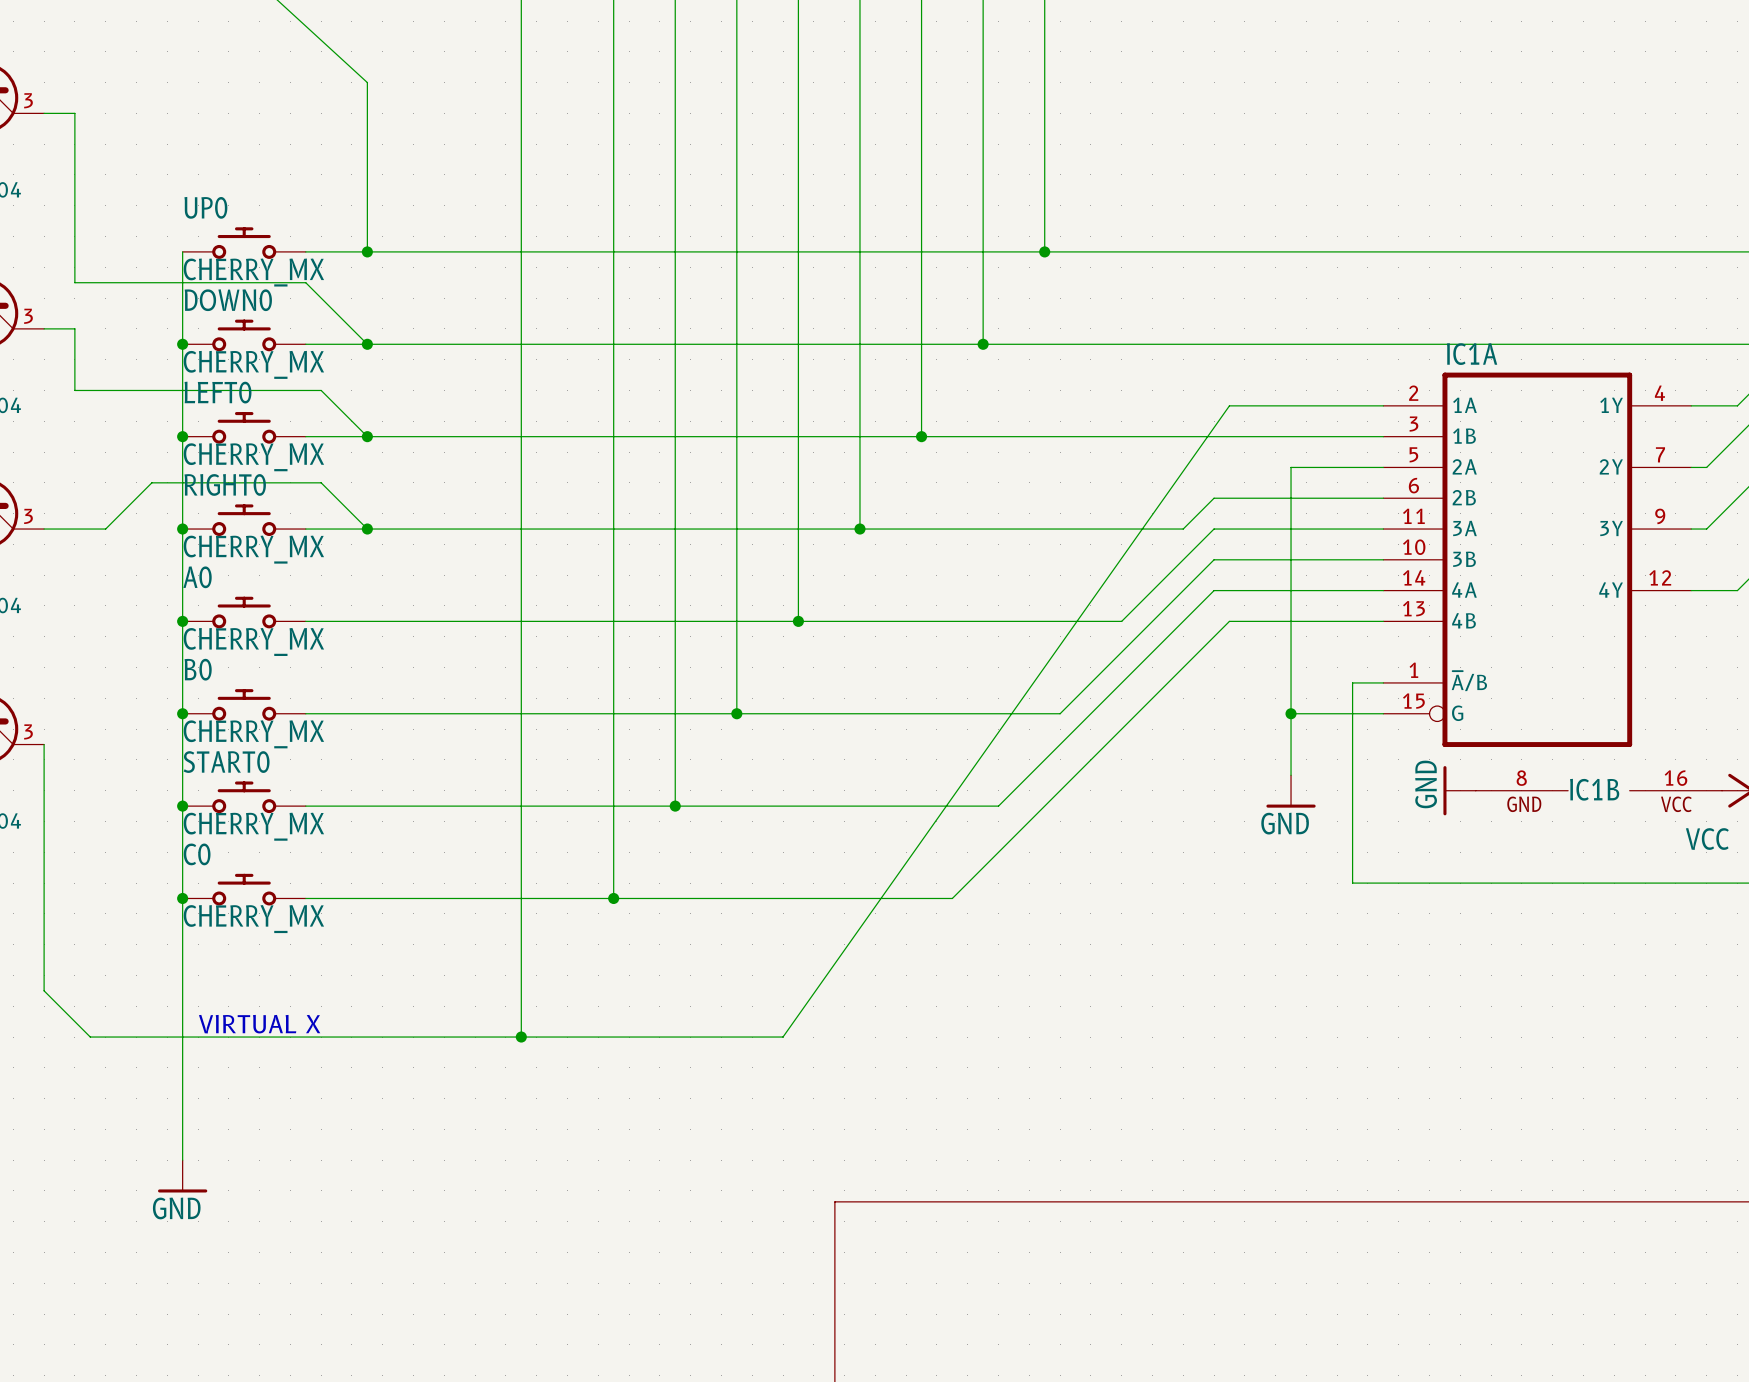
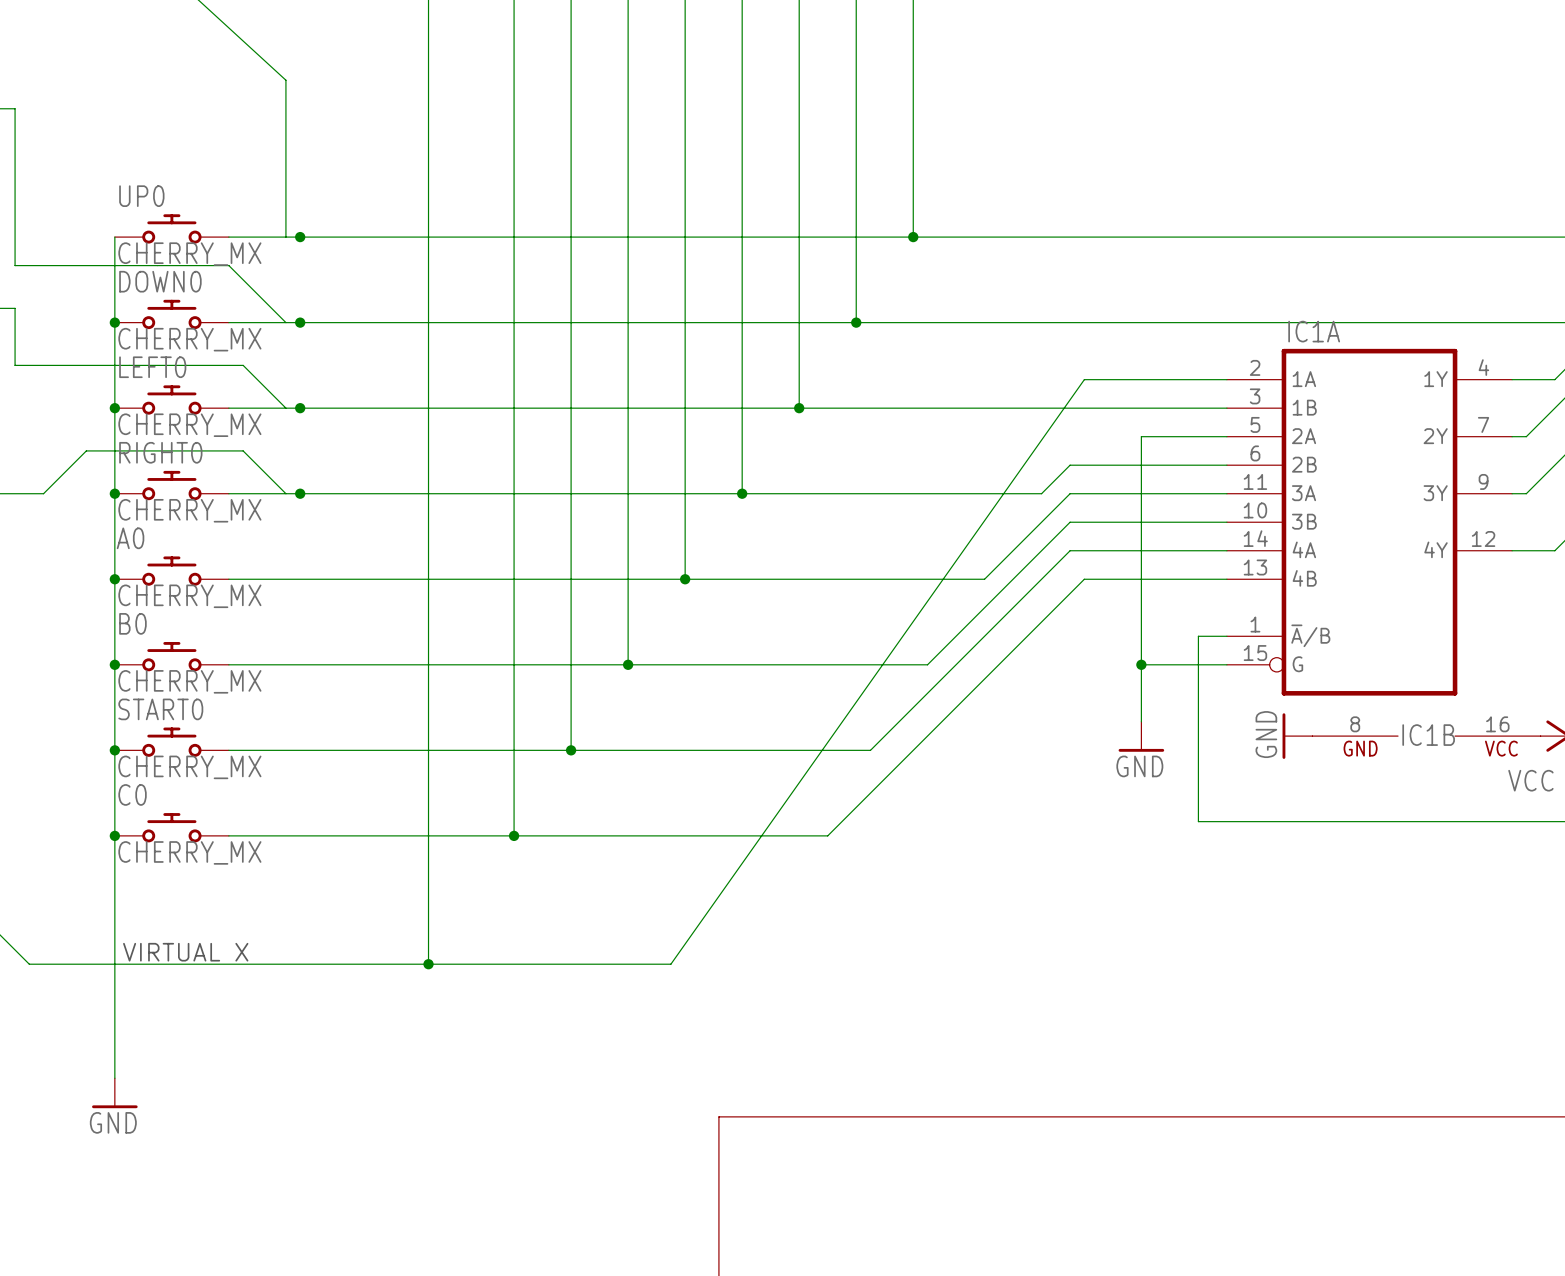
junction position: (367, 251) -> (300, 237)
junction position: (367, 344) -> (300, 322)
junction position: (367, 436) -> (300, 408)
junction position: (367, 529) -> (300, 493)

